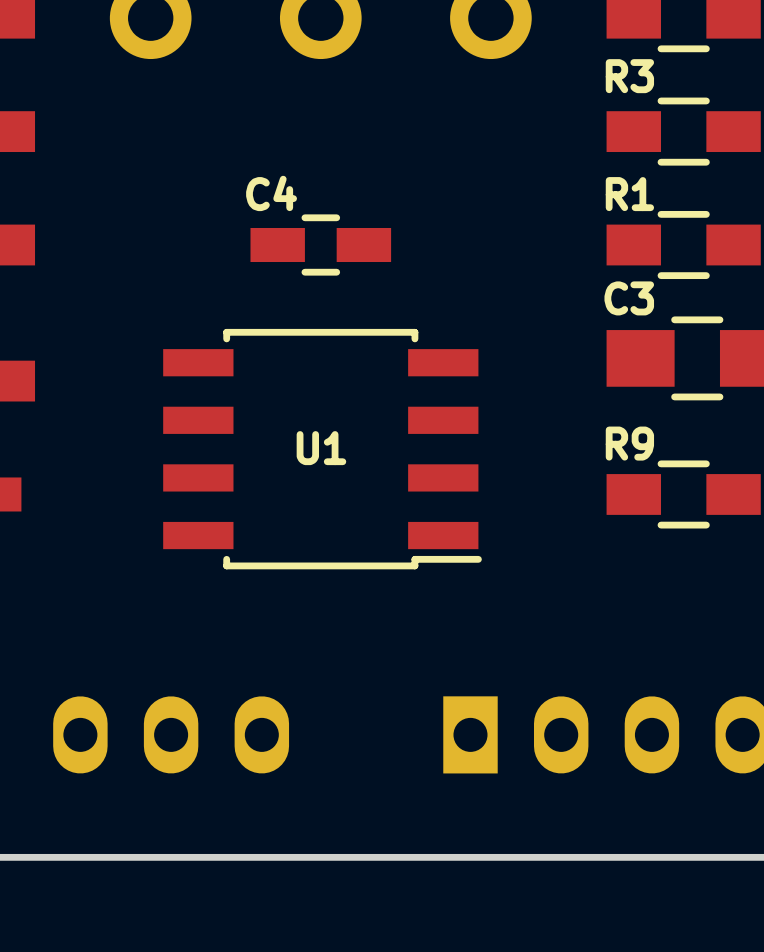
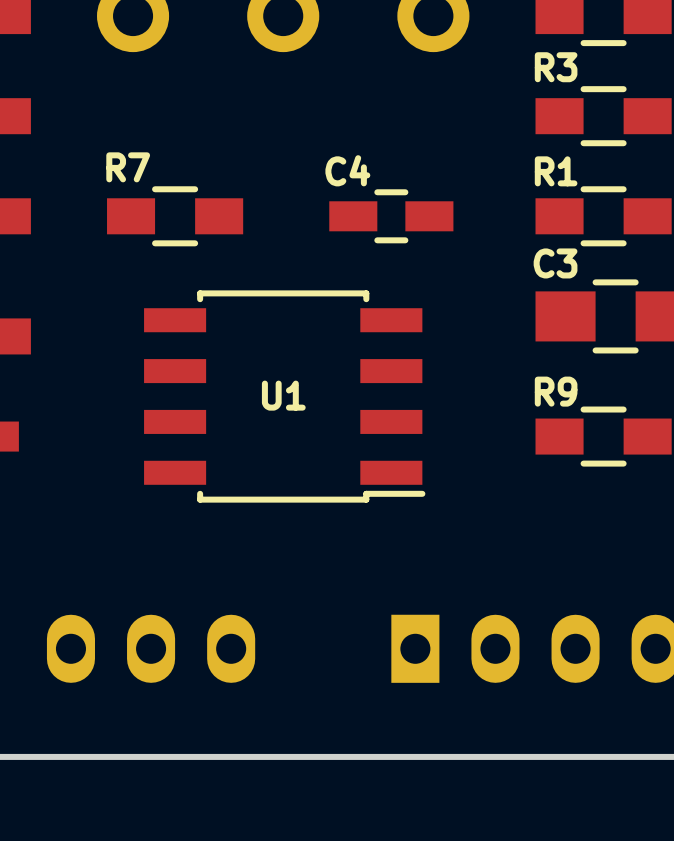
R7: none -> (175, 216)
C4 position: (320, 245) -> (391, 216)

